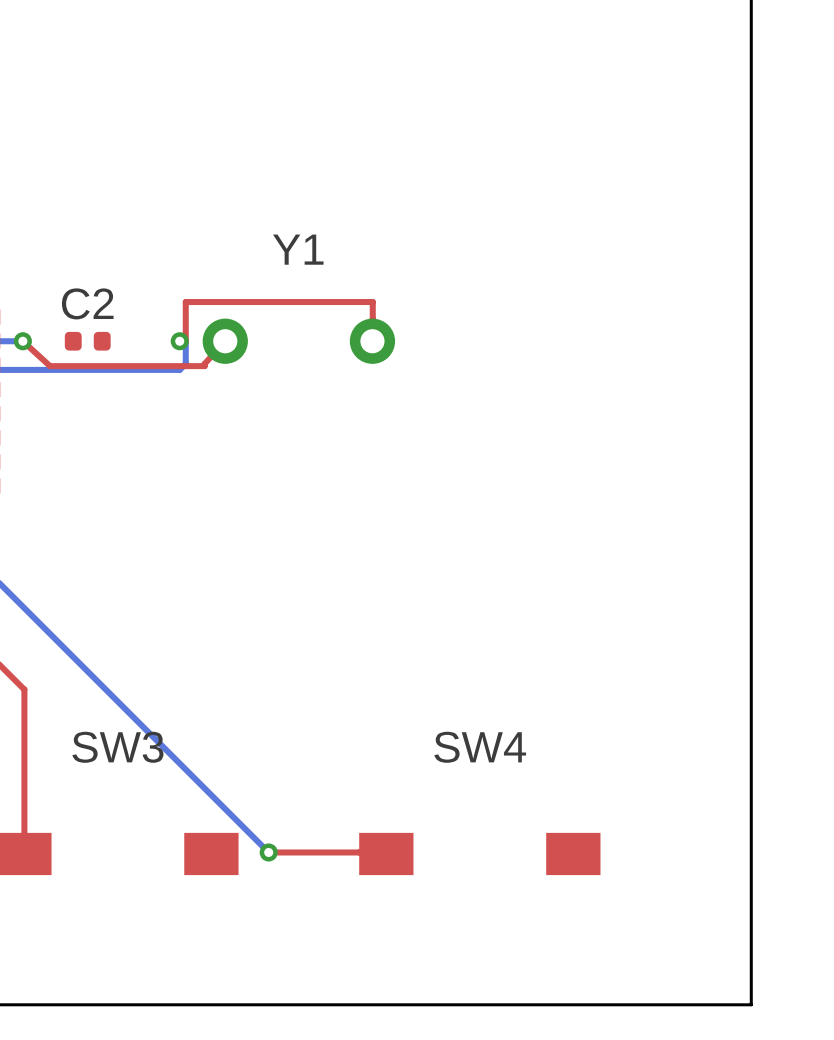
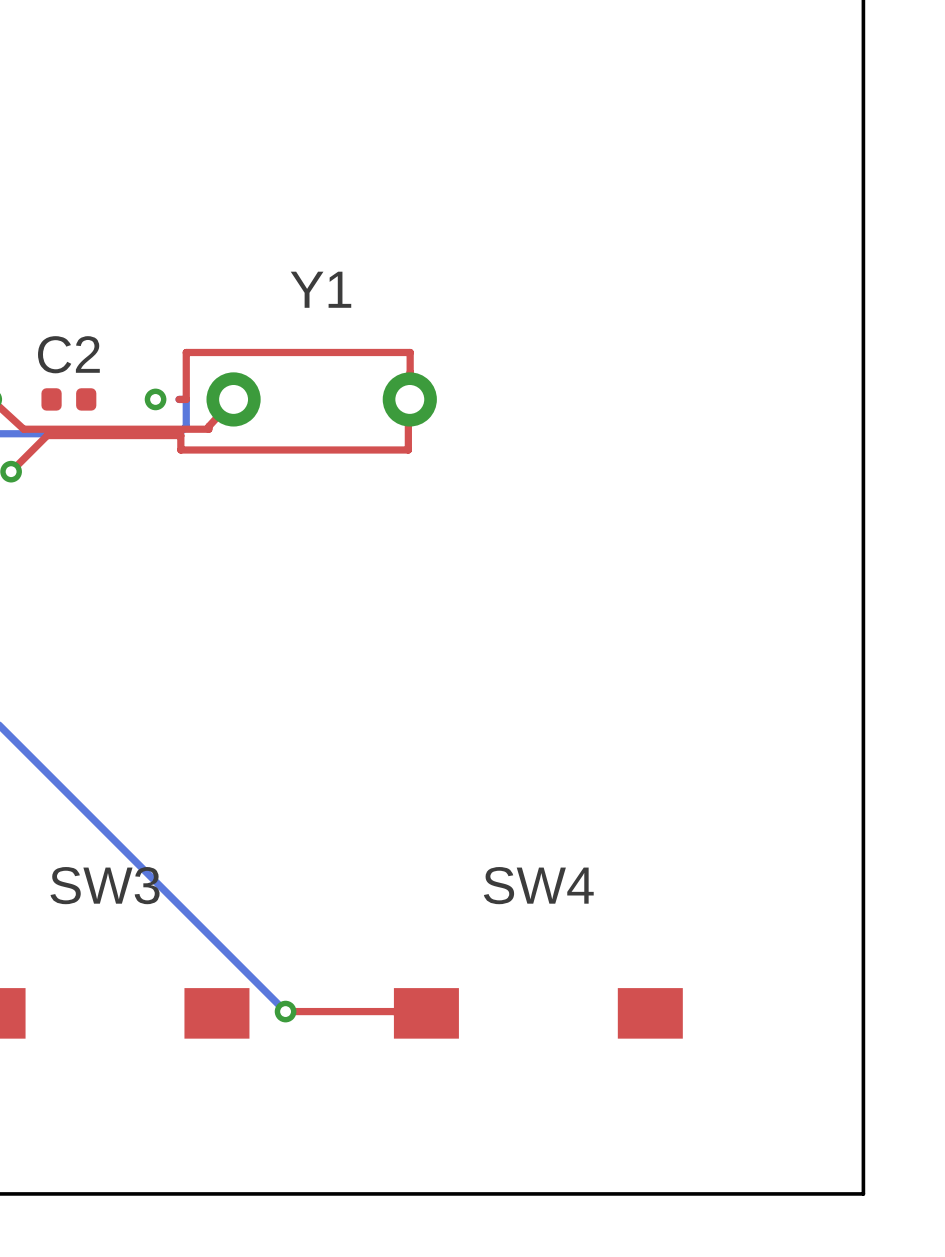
via position: (179, 341) -> (155, 399)
top track: none -> (409, 399) (408, 449) (180, 449) (180, 435) (47, 435) (11, 471)
via: none -> (11, 471)

